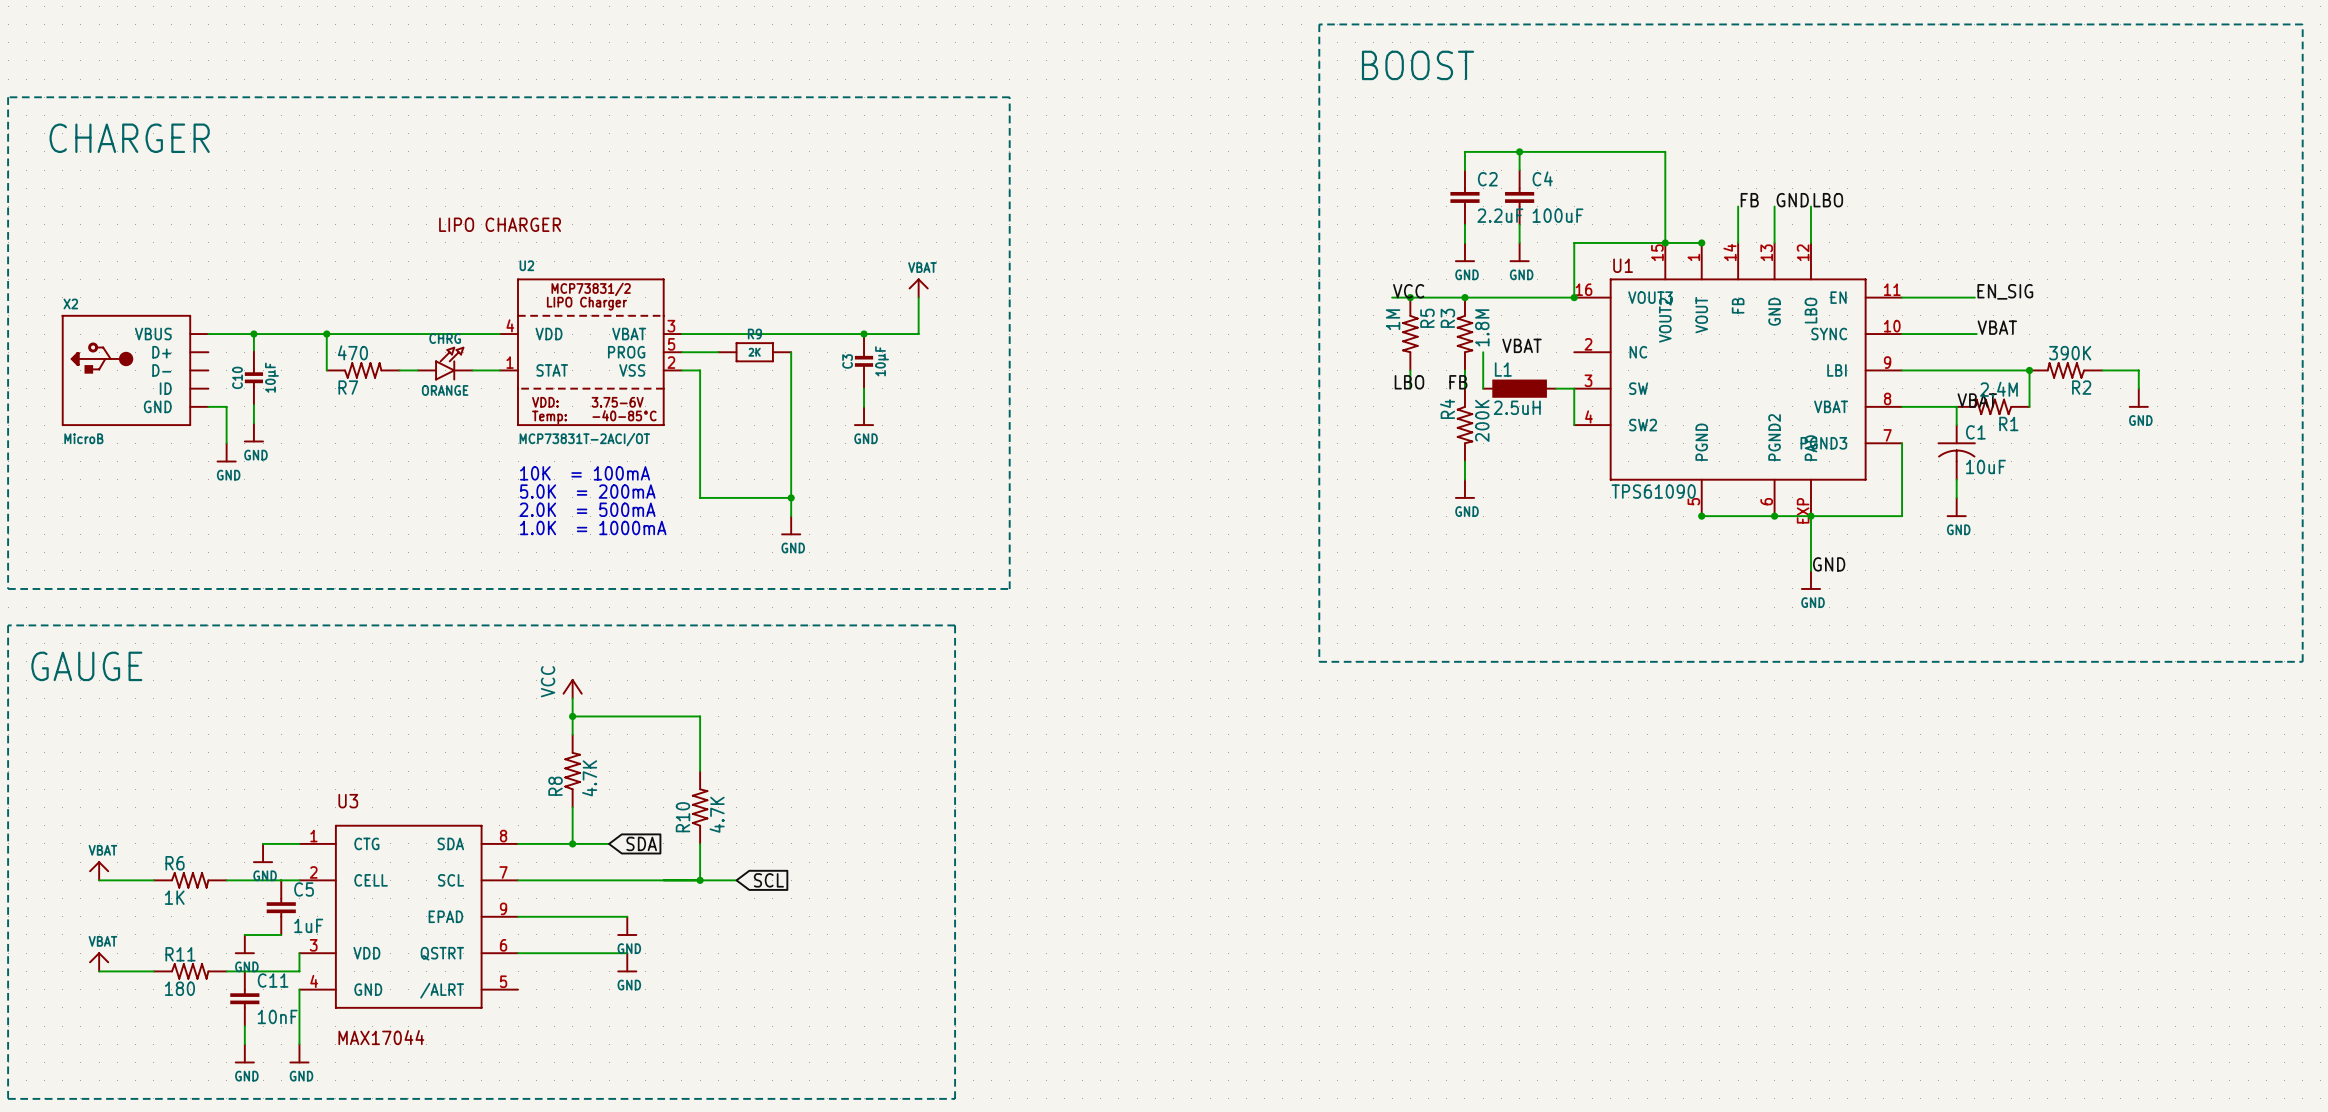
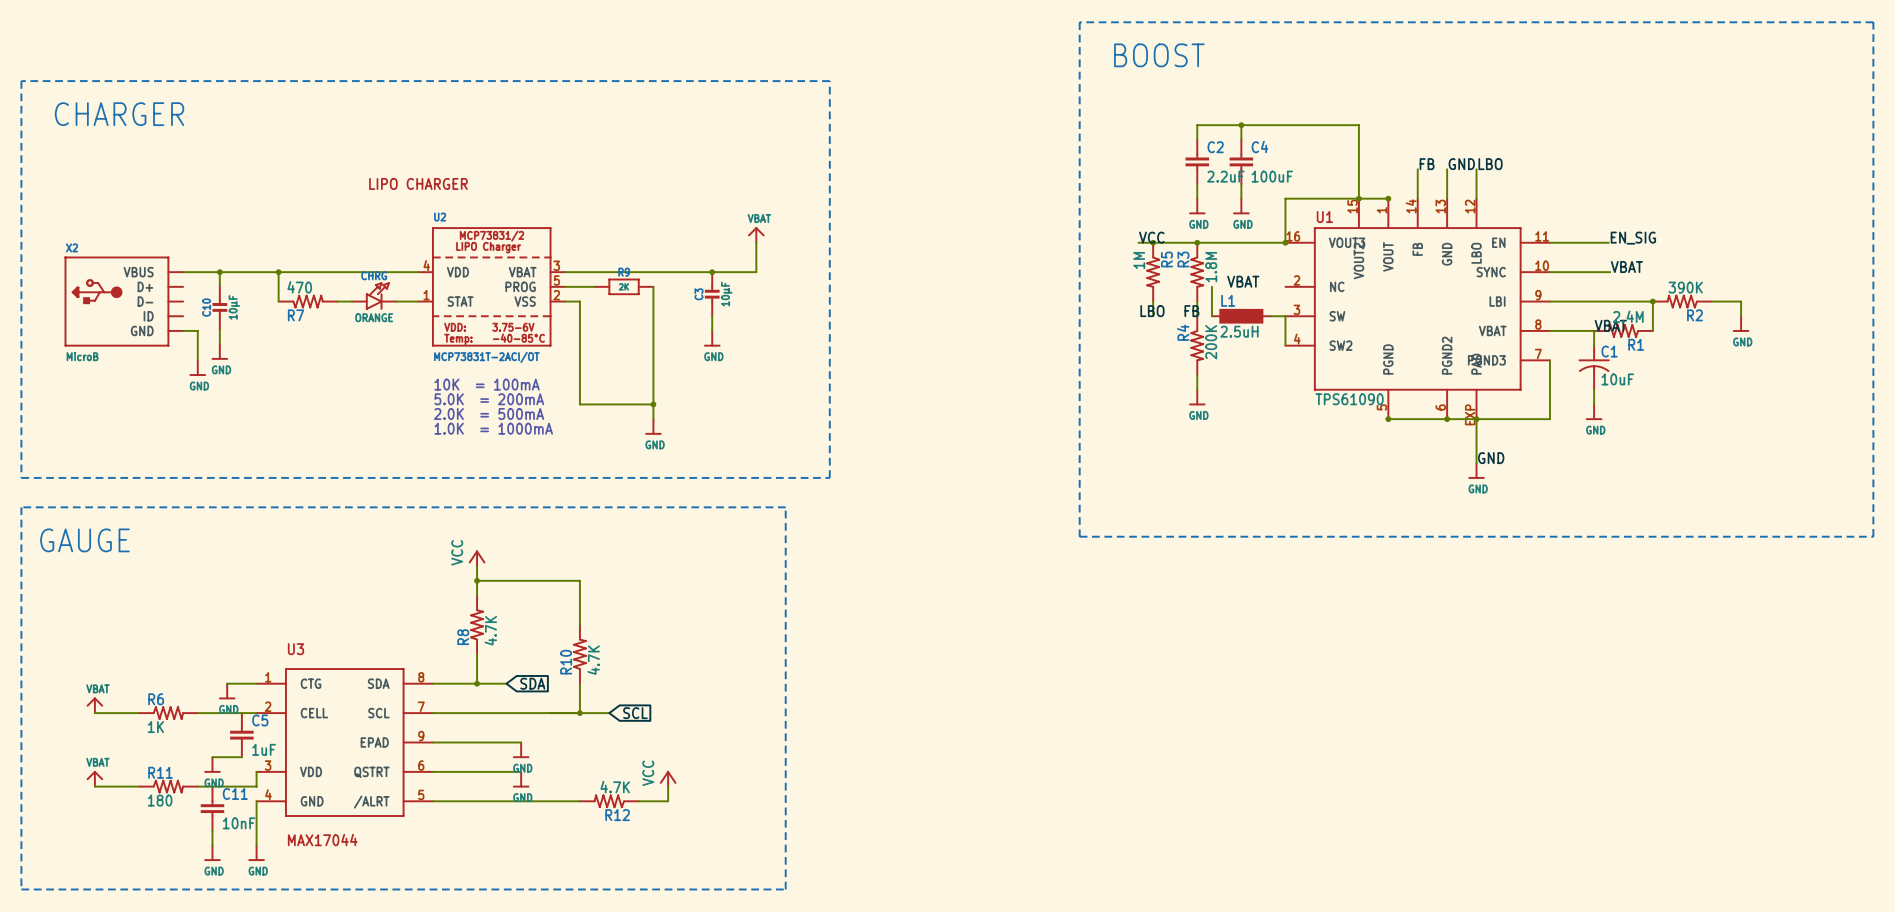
power symbol: none -> VCC (668, 778)
wire: none -> (668, 786) (668, 801) (638, 801)
wire: none -> (432, 801) (579, 801)
R12: none -> 4.7K (609, 801)

